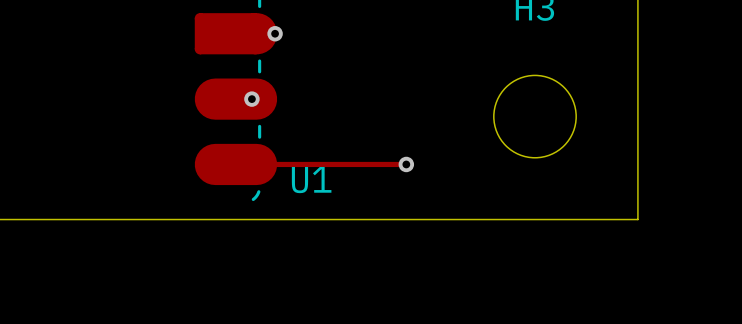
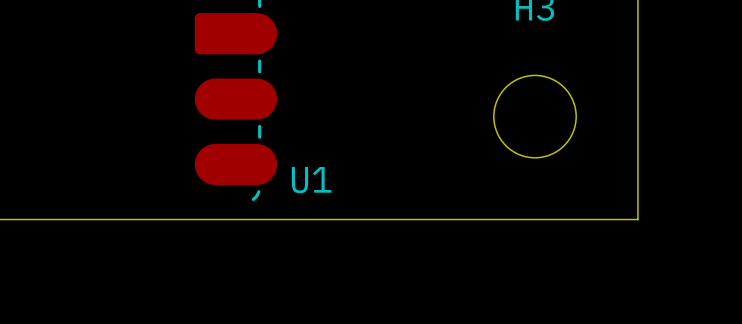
via: (275, 33) -> none
via: (251, 99) -> none
track: (235, 164) (406, 164) -> none
via: (406, 164) -> none

